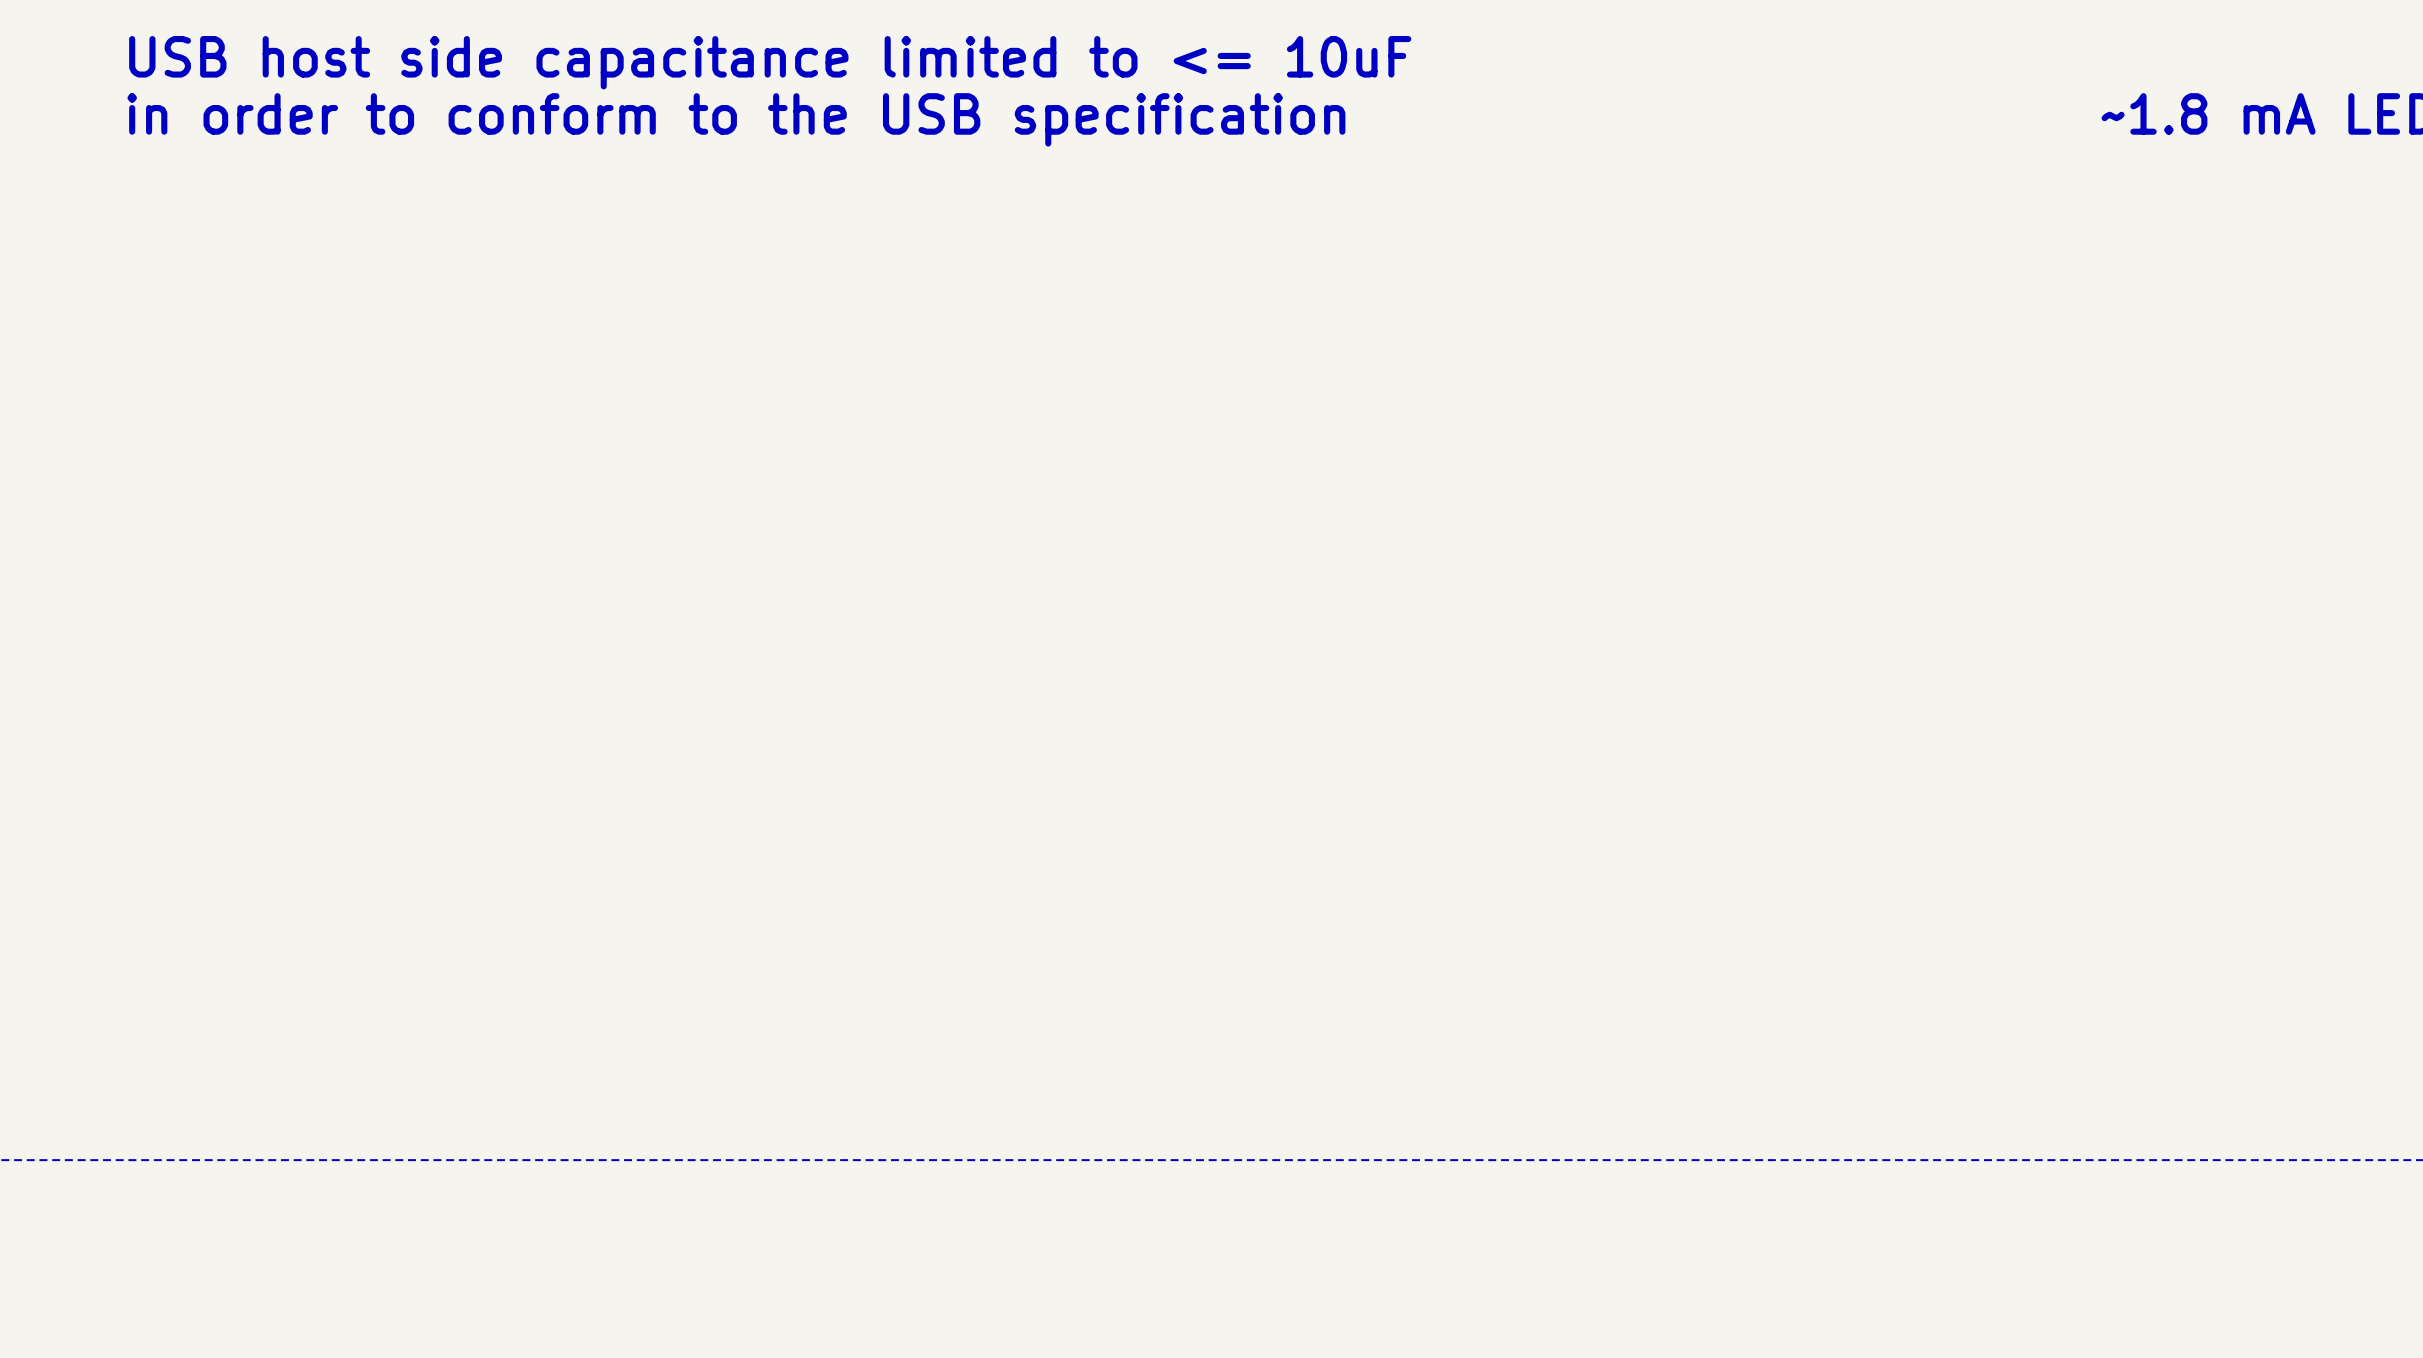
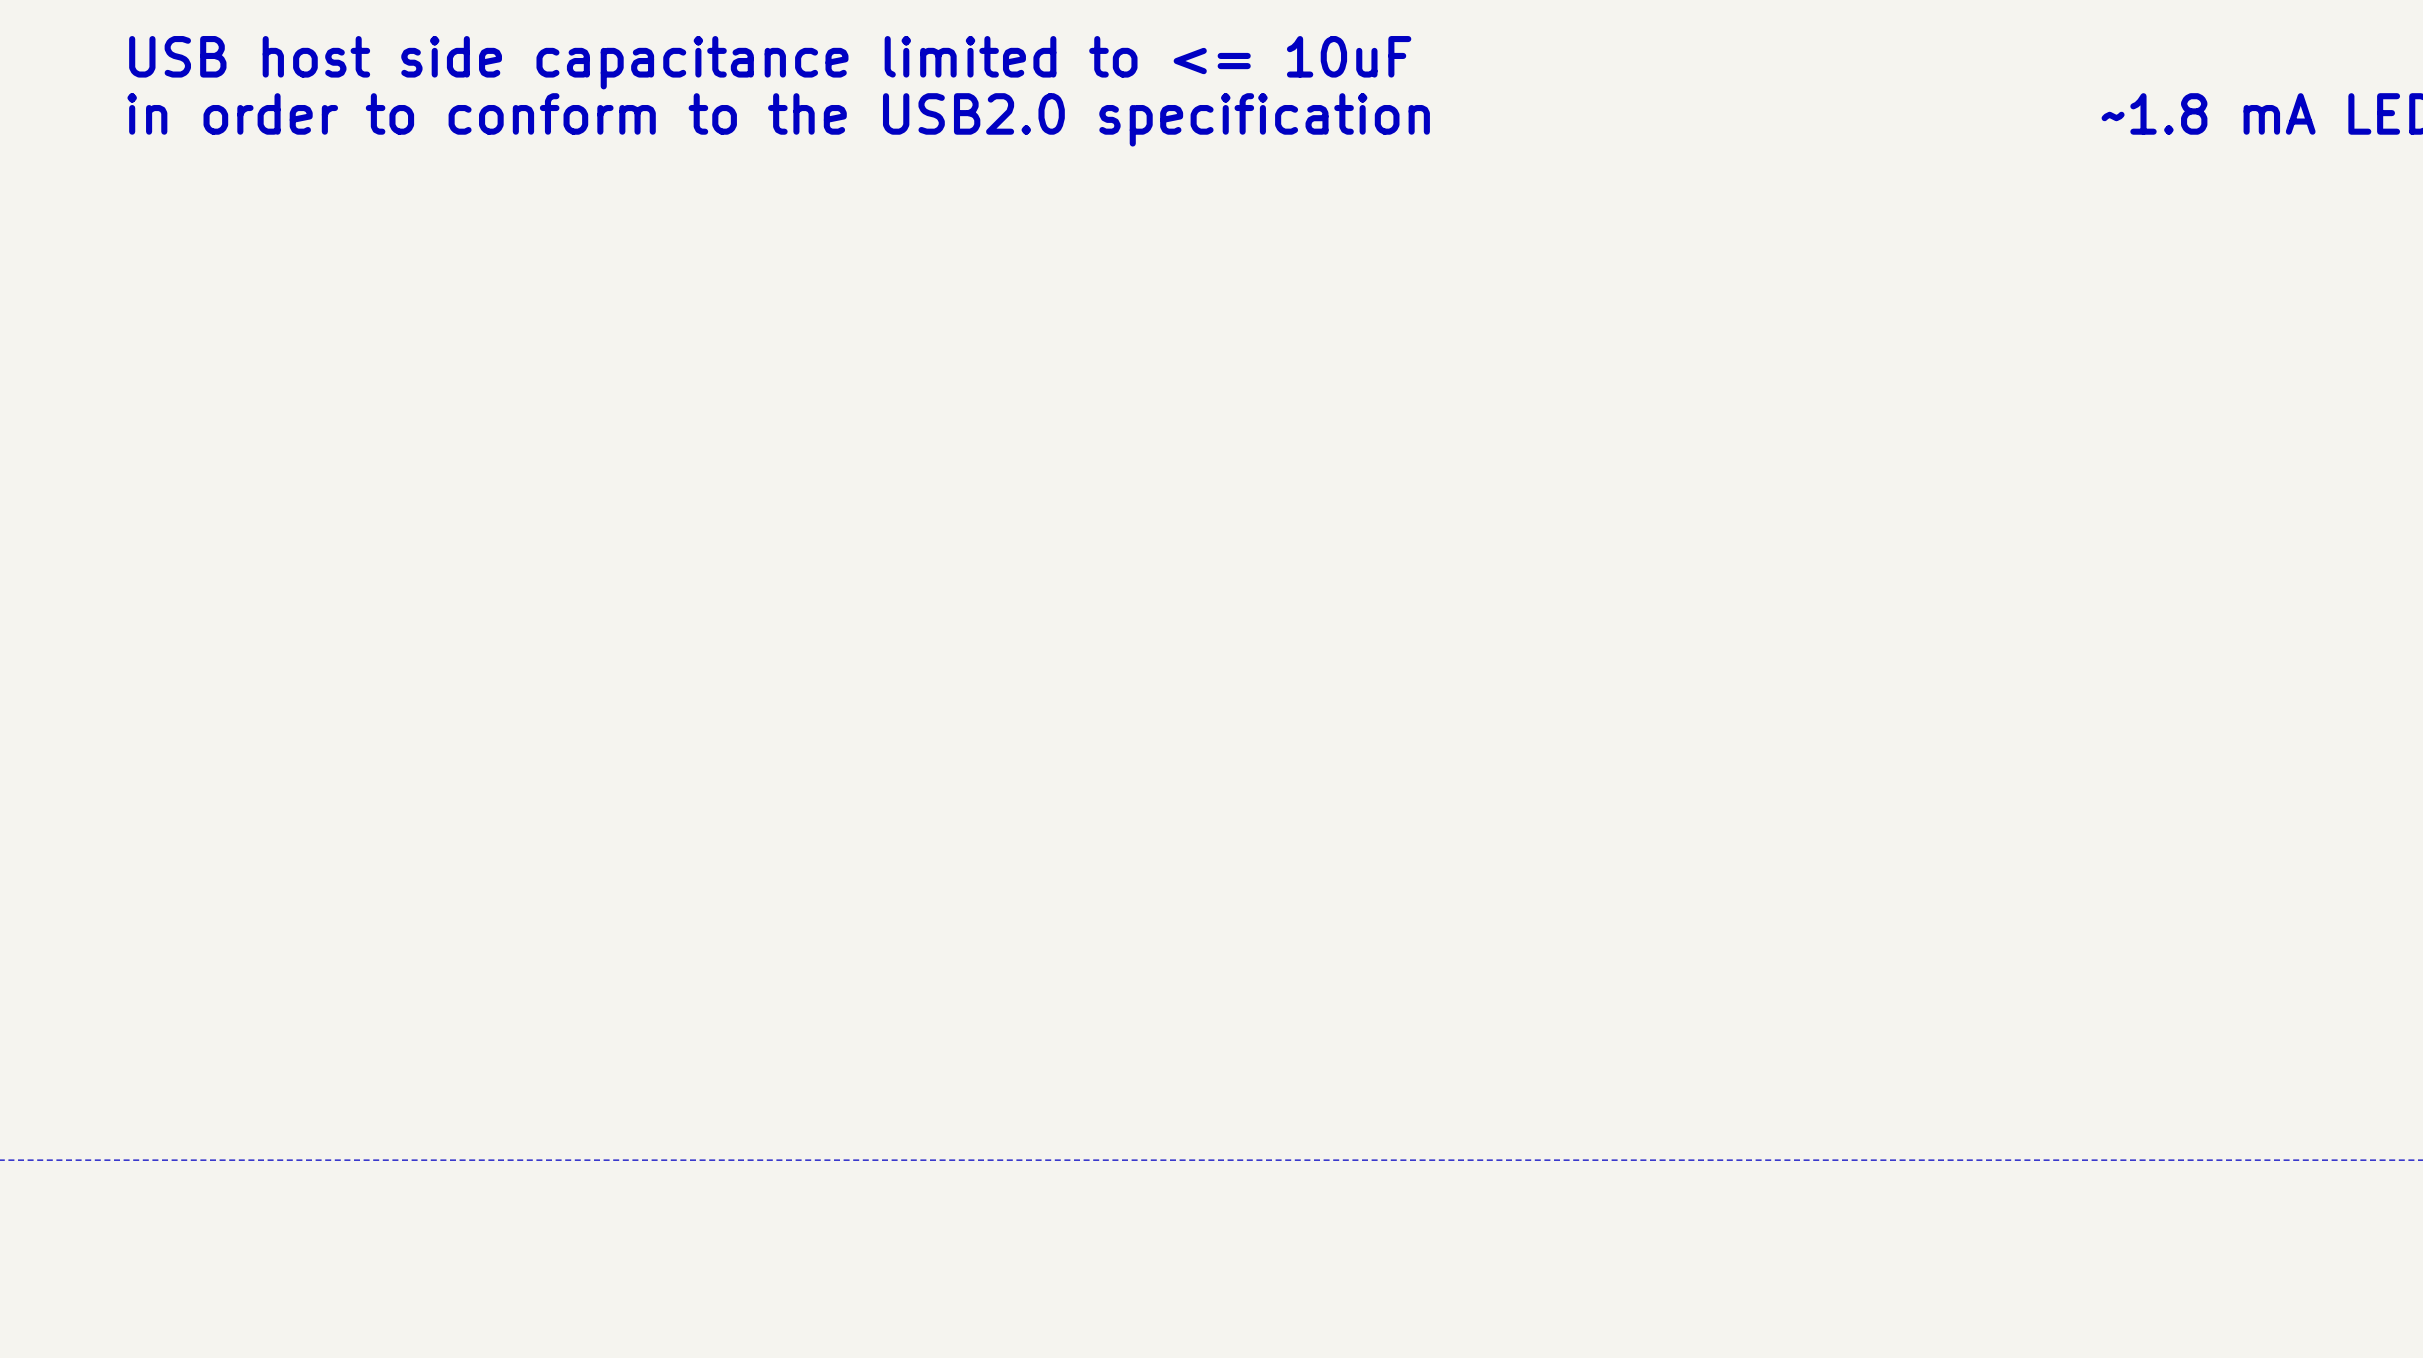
text: in order to conform to the USB specification (736, 119) -> in order to conform to the USB2.0 specification (778, 119)

